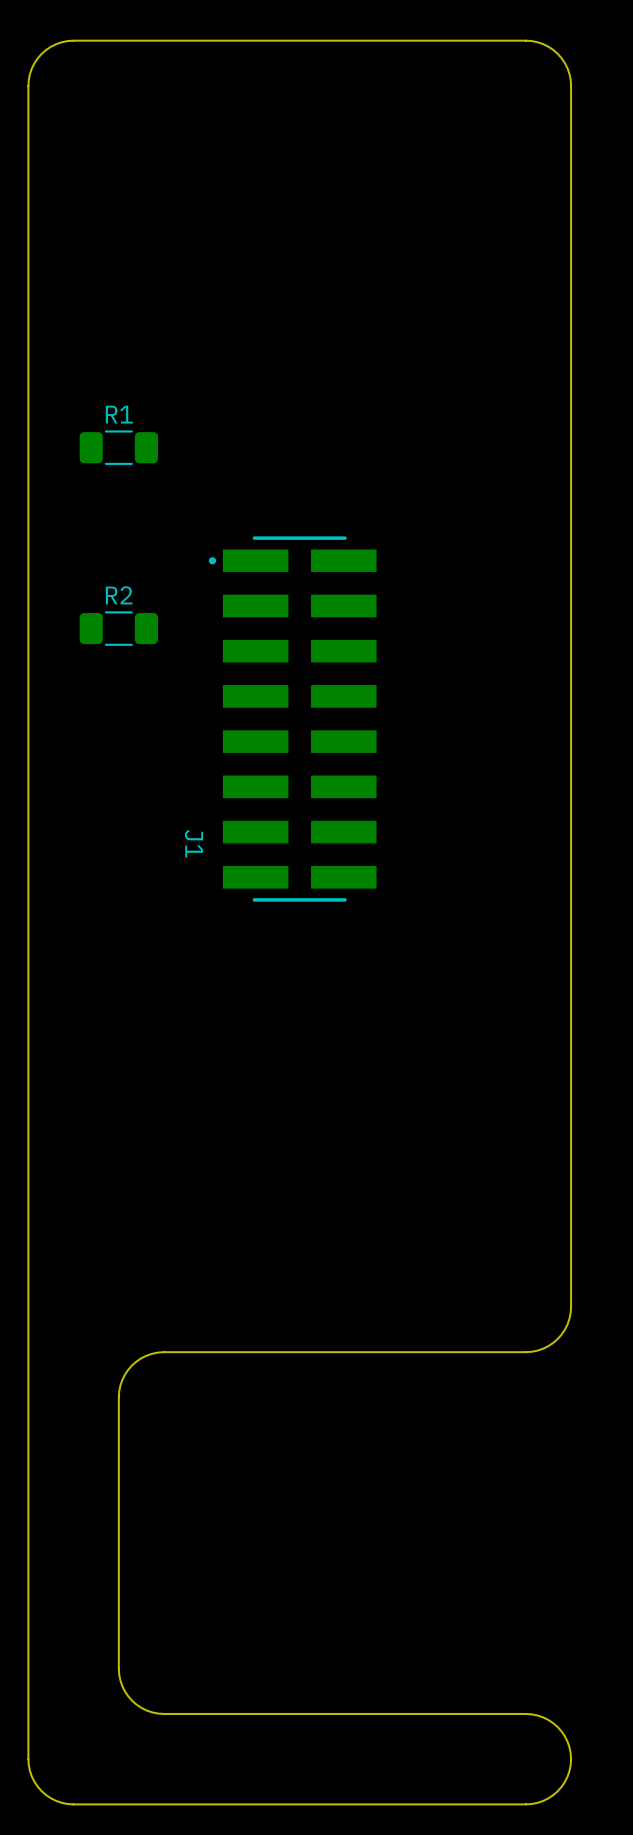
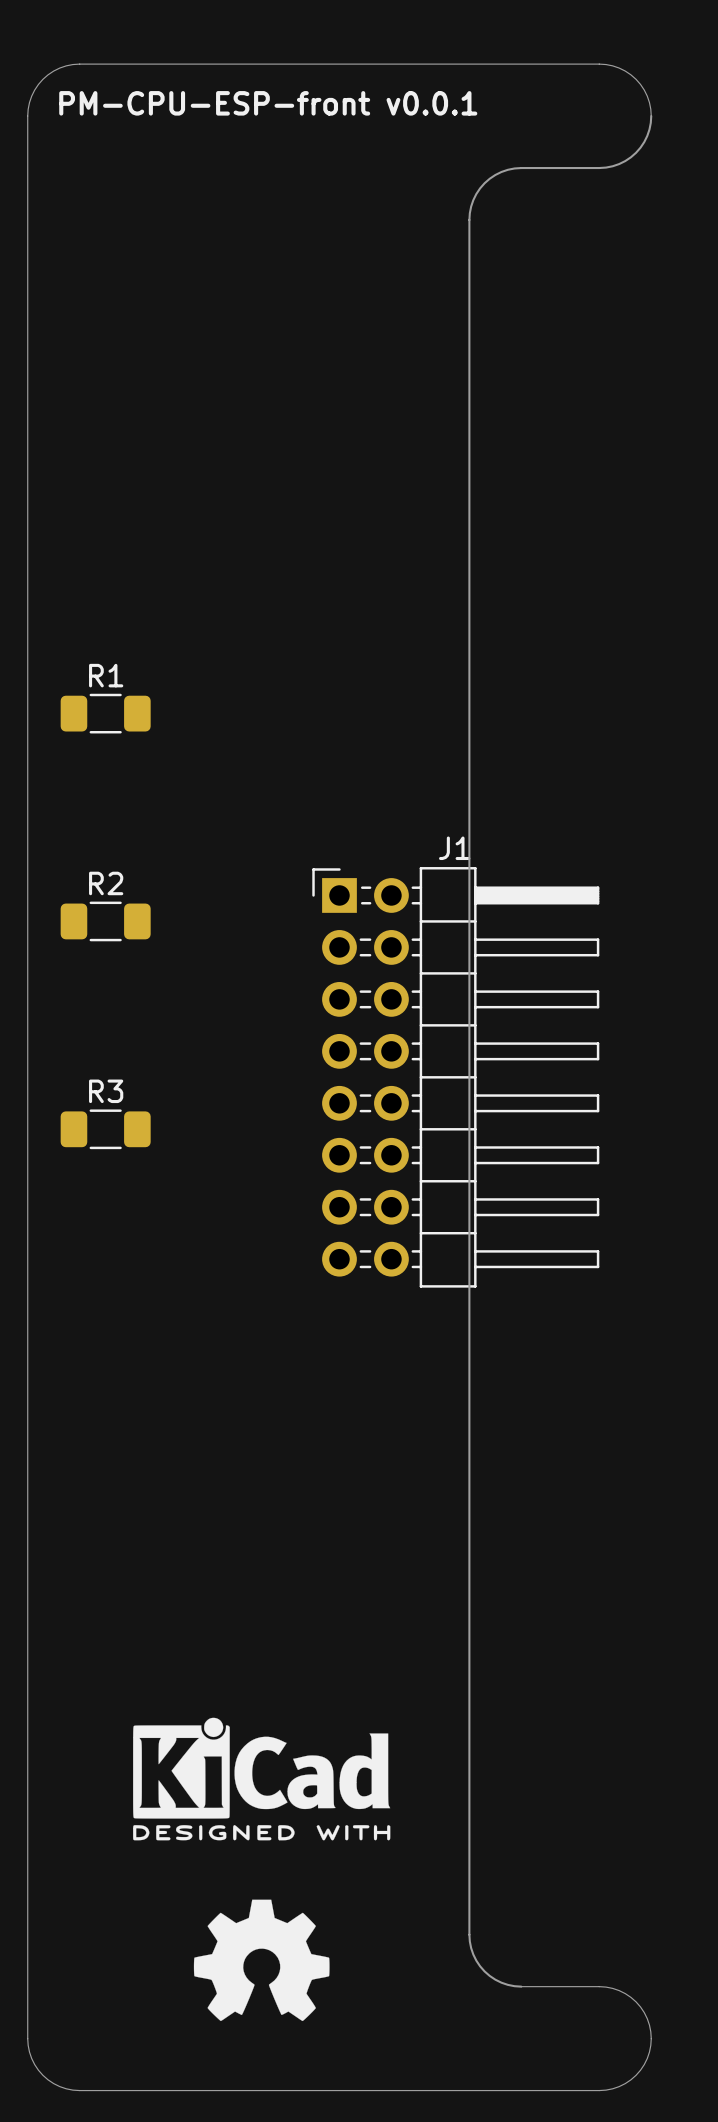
text: none -> PM-CPU-ESP-front v0.0.1 (268, 103)
board edge: (571, 85) (571, 1306) (567, 1324) (561, 1334) (553, 1342) (543, 1348) (531, 1351) (158, 1352) (146, 1355) (132, 1365) (122, 1380) (119, 1391) (118, 1668) (122, 1686) (132, 1700) (146, 1710) (164, 1713) (458, 1713) -> (651, 116) (649, 129) (644, 142) (636, 152) (625, 161) (606, 167) (507, 169) (495, 174) (484, 183) (476, 194) (469, 213) (469, 1934) (473, 1954) (484, 1971) (501, 1982) (521, 1986)
R1 position: (118, 447) -> (105, 713)
J1 footprint: [208, 536, 377, 902] -> [312, 867, 600, 1288]
R2 position: (118, 628) -> (105, 921)
J1 name position: J1 (194, 843) -> J1 (454, 848)
R3: none -> (105, 1129)
drawing: none -> [133, 1717, 391, 1841]
drawing: none -> [193, 1899, 330, 2022]

